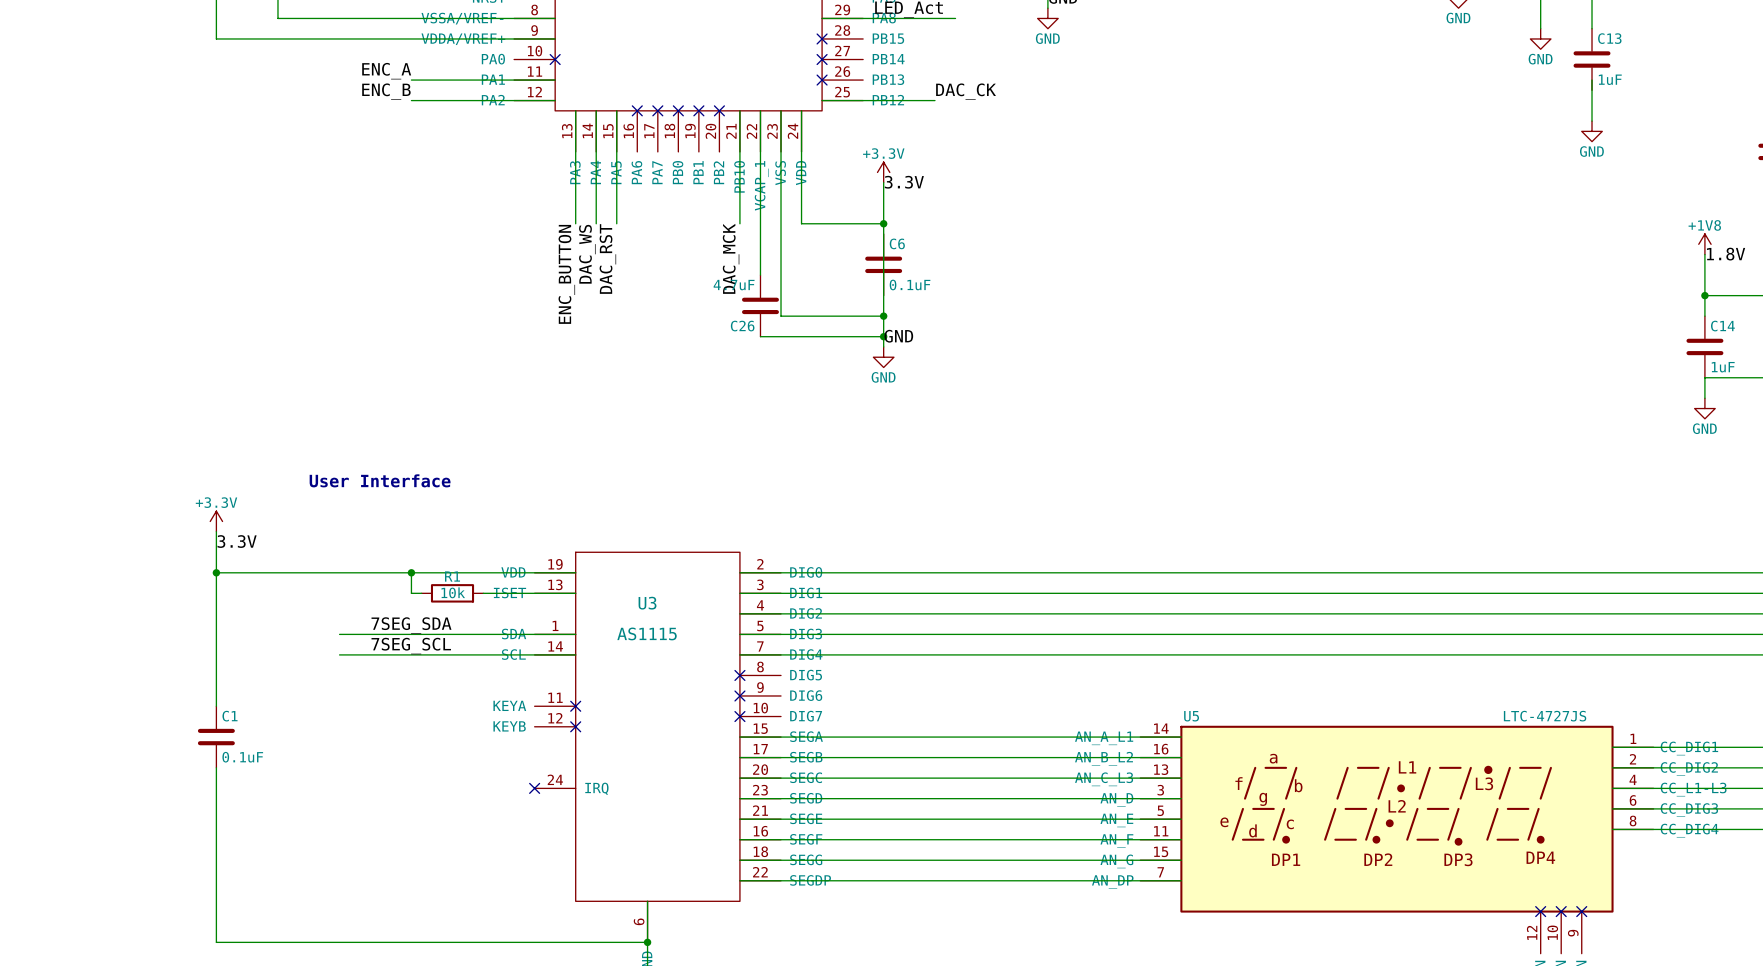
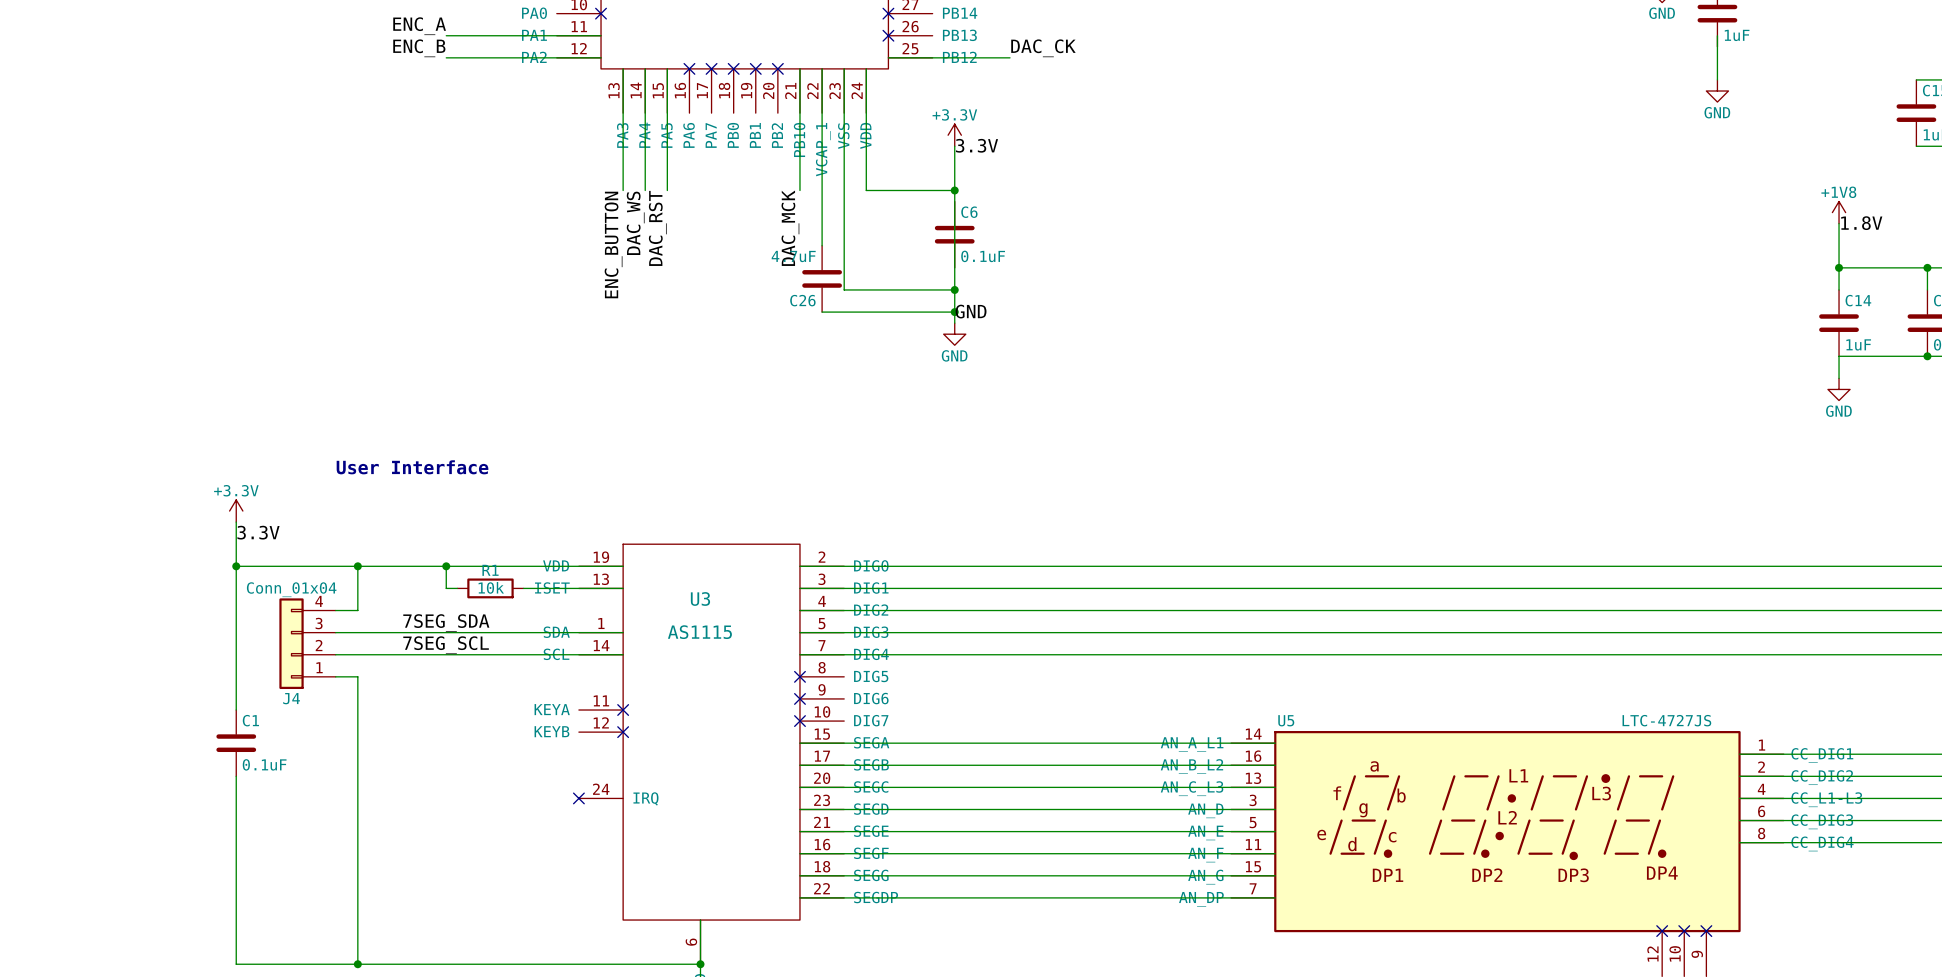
wire: none -> (357, 566) (357, 610) (335, 610)
junction: none -> (357, 566)
wire: none -> (335, 632) (368, 632)
J4: none -> Conn_01x04 (307, 643)
wire: none -> (335, 654) (368, 654)
wire: none -> (335, 676) (357, 676) (357, 964)
junction: none -> (357, 964)

